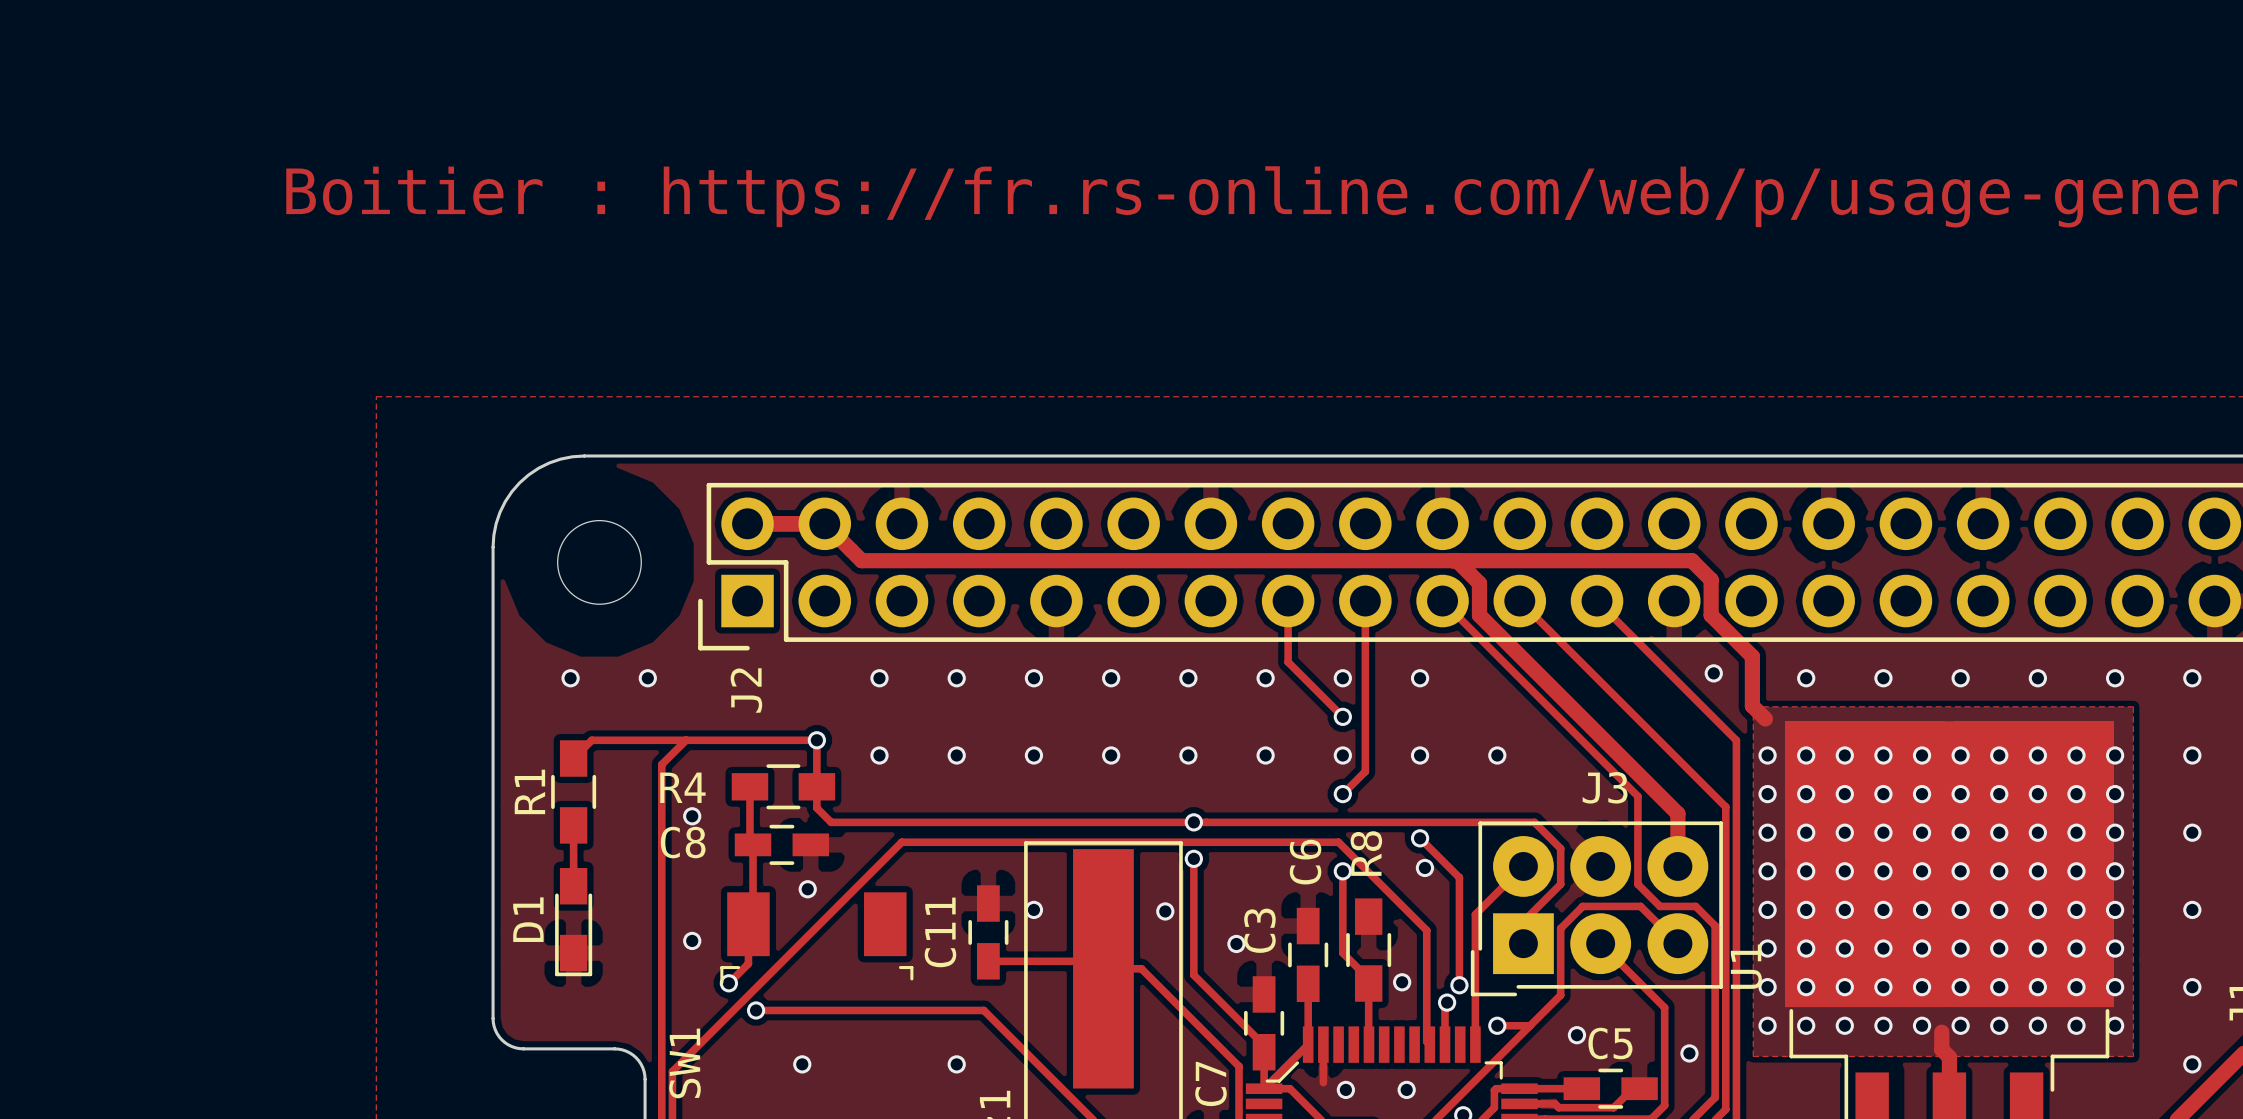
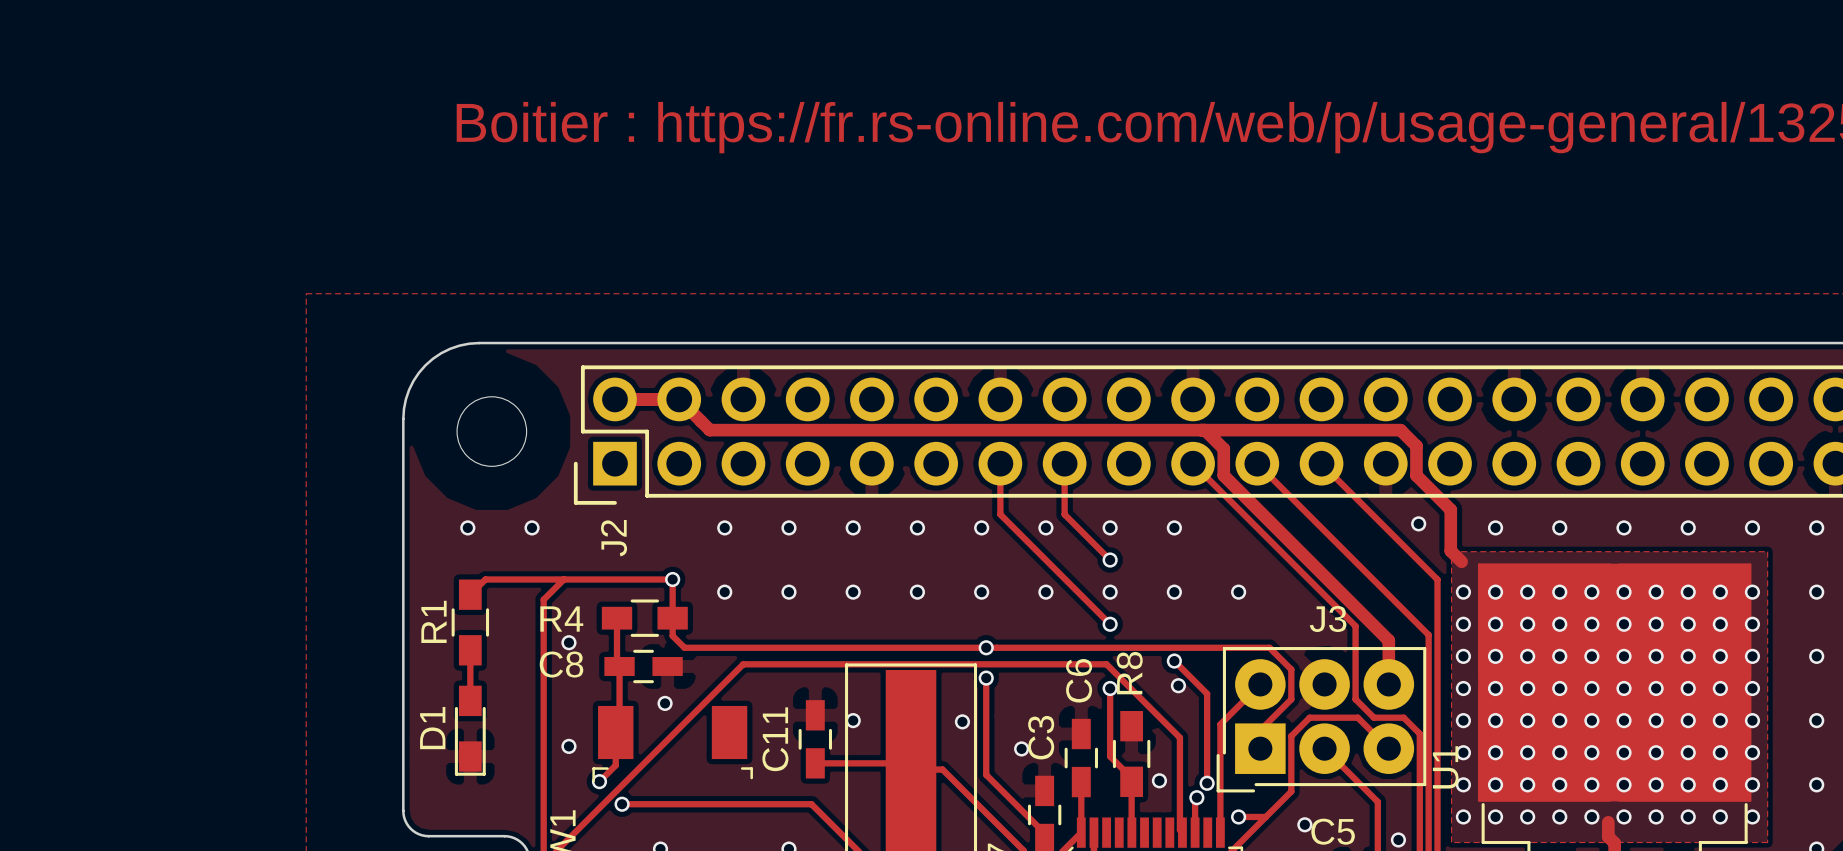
track: (1365, 601) (1365, 771) (1342, 794) -> (1000, 463) (1000, 514) (1110, 624)

